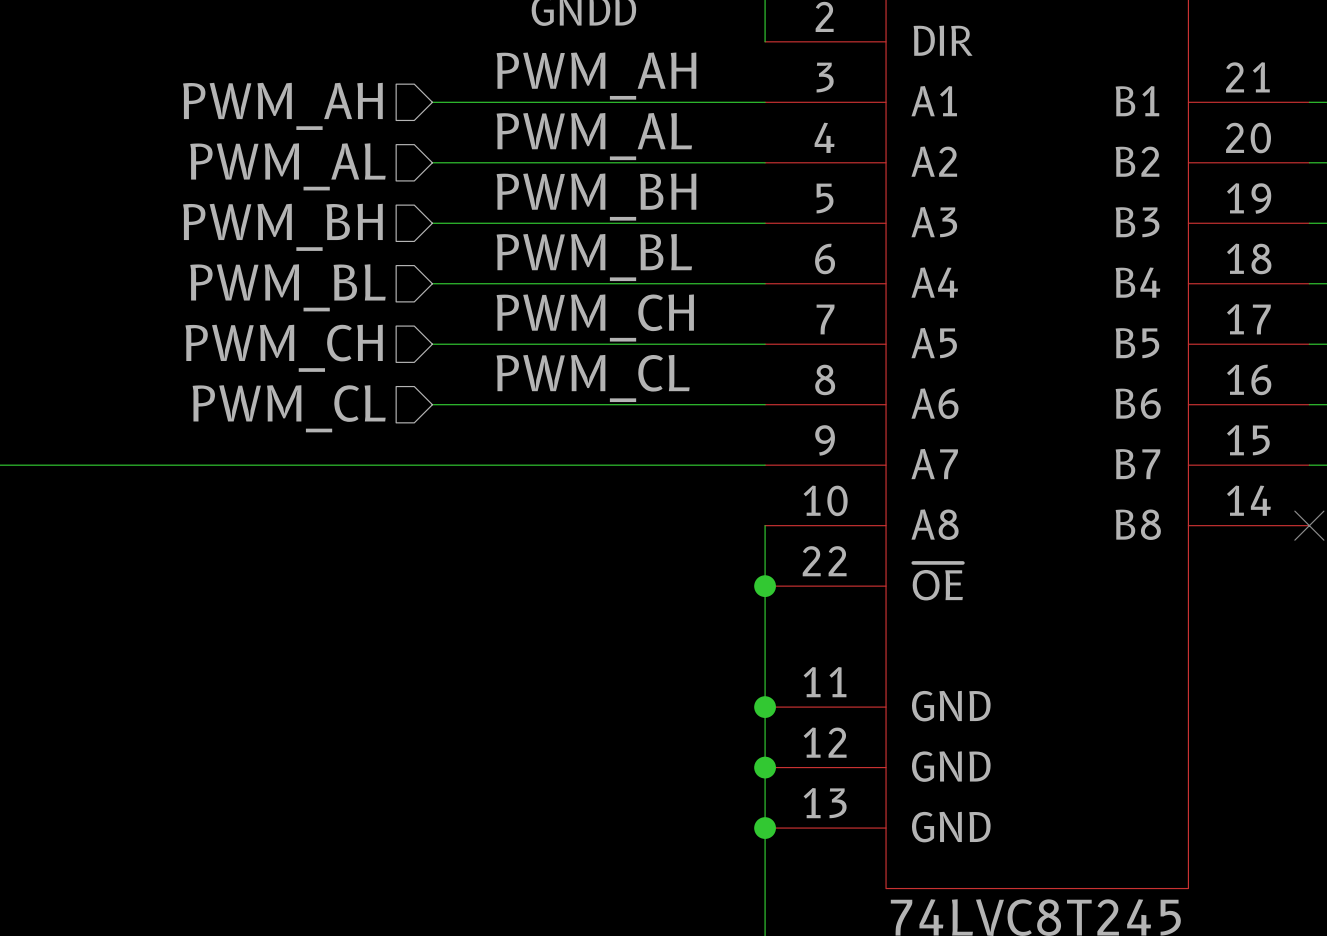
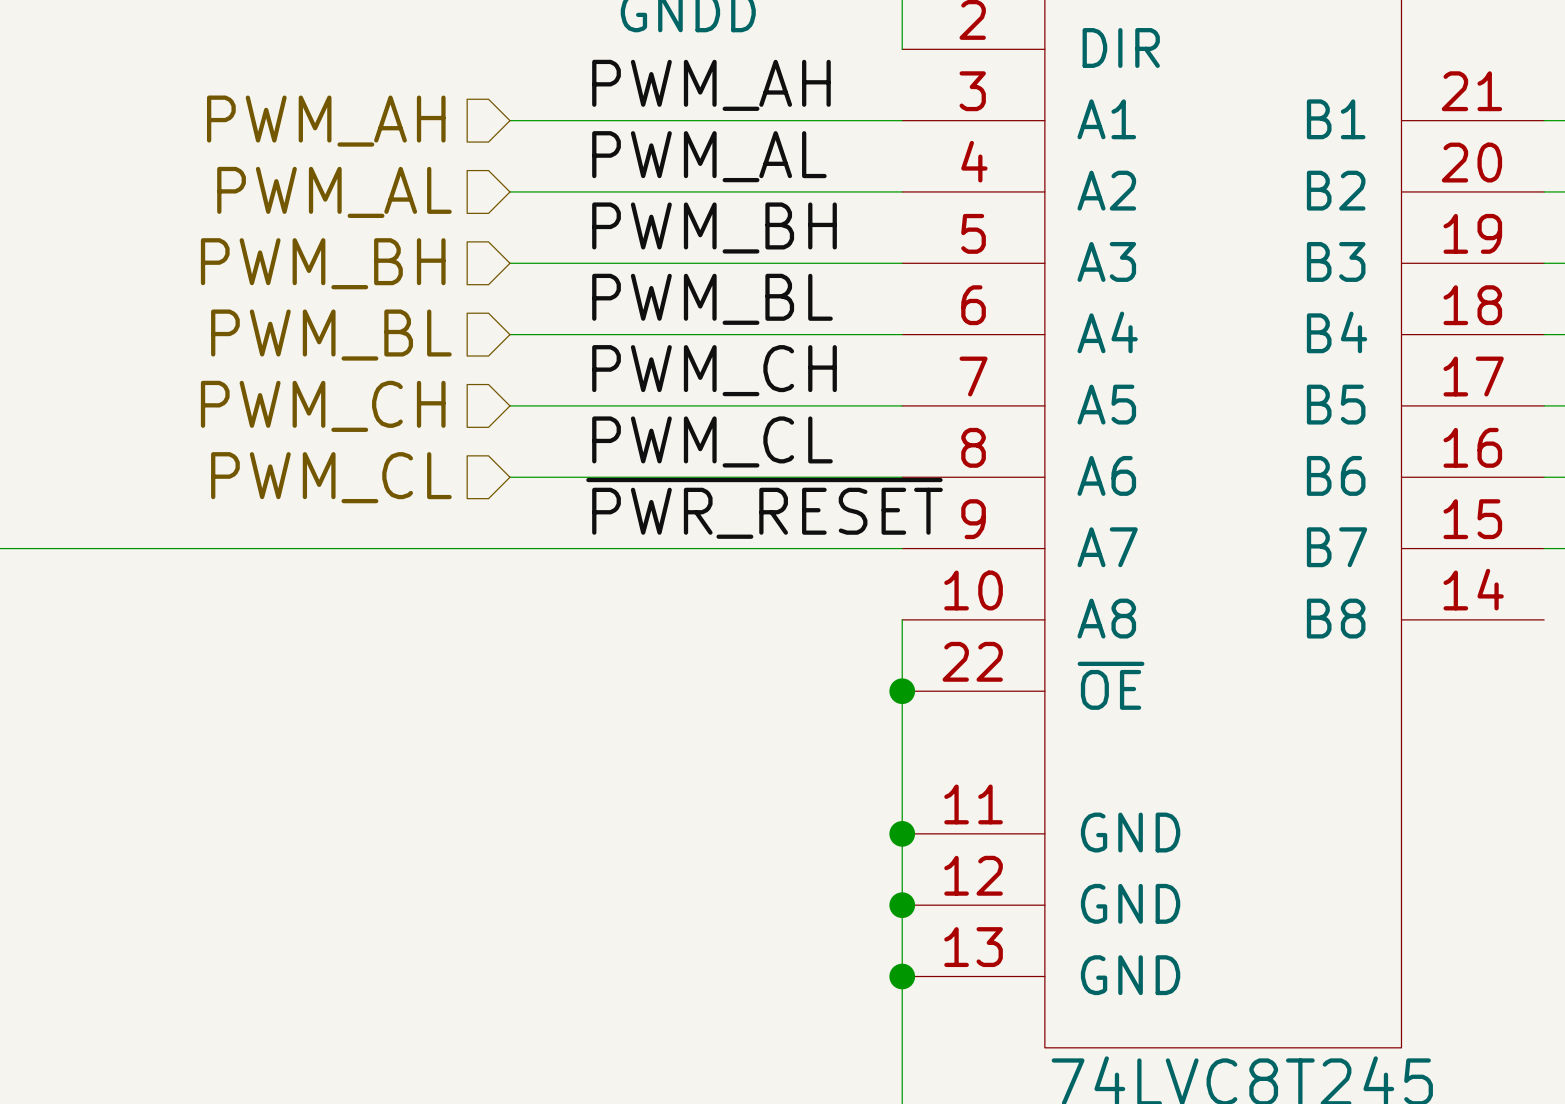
label: none -> ~{PWR_RESET} (764, 508)
no-connect mark: (1309, 525) -> none

